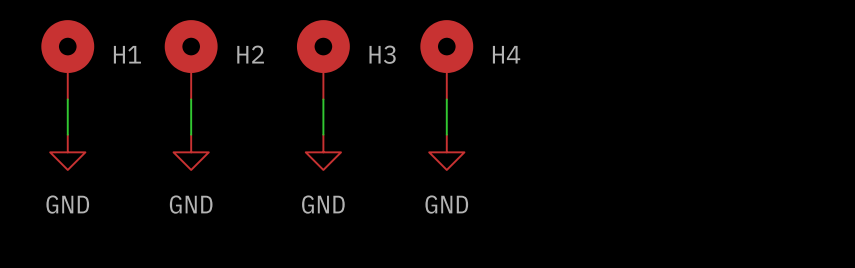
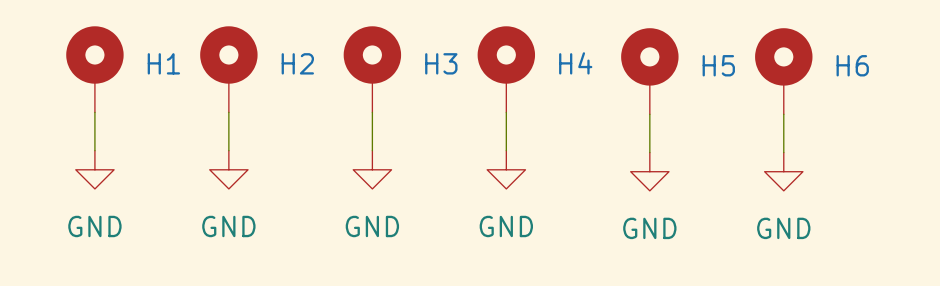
H5: none -> (649, 71)
H6: none -> (783, 71)
wire: none -> (649, 114) (649, 152)
wire: none -> (783, 114) (783, 152)
power symbol: none -> GND (649, 171)
power symbol: none -> GND (783, 171)

